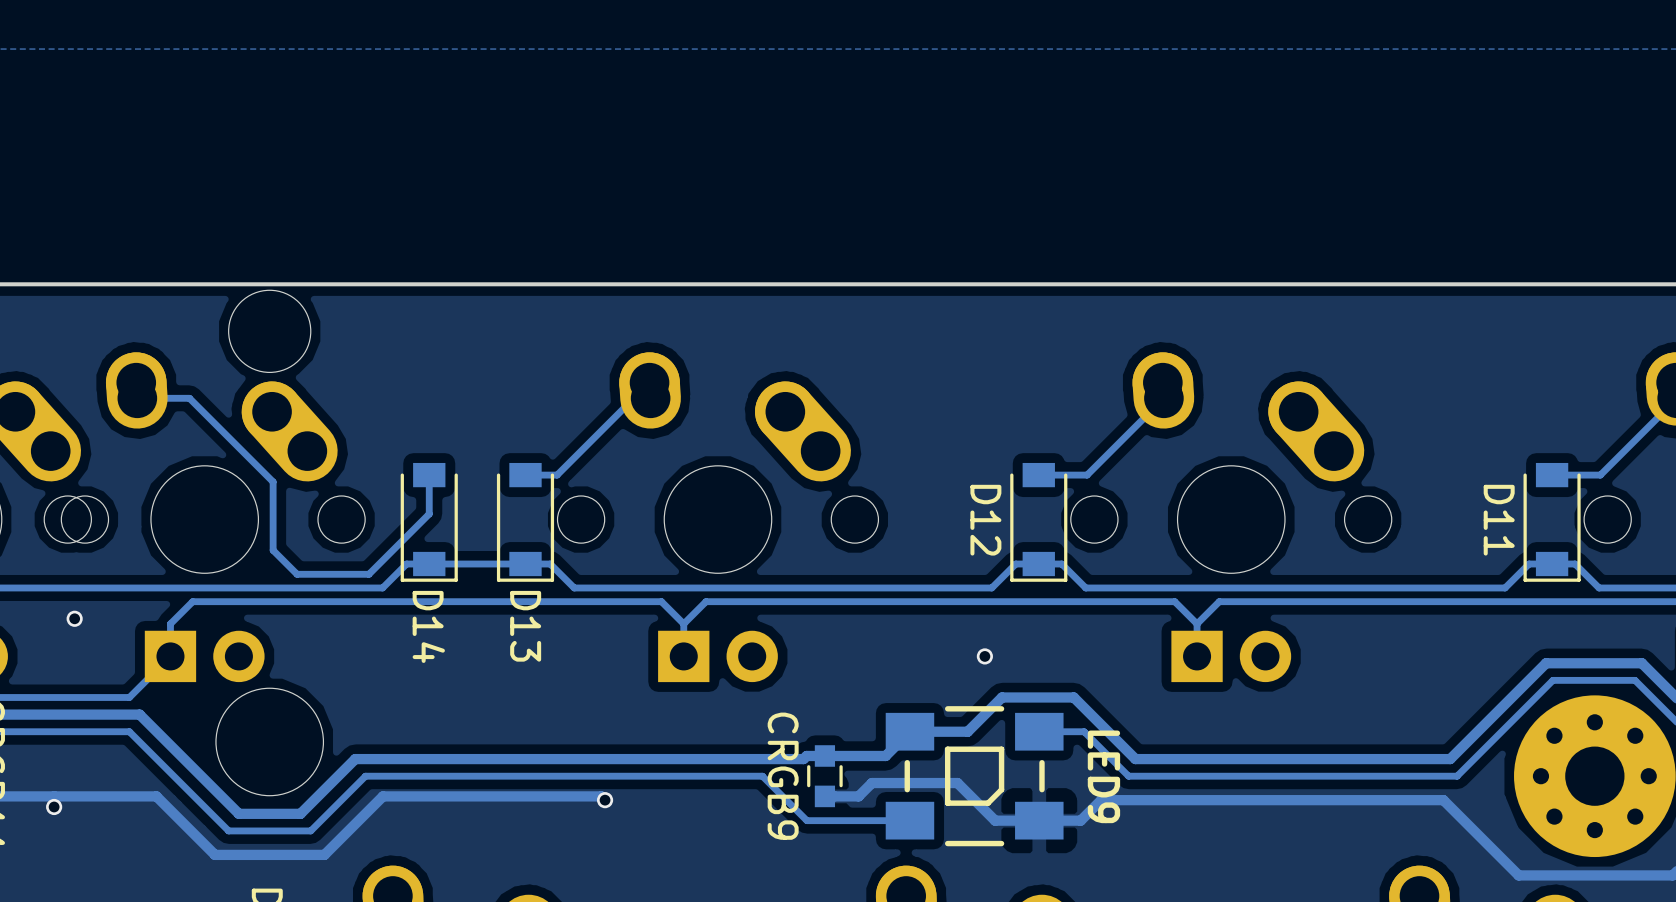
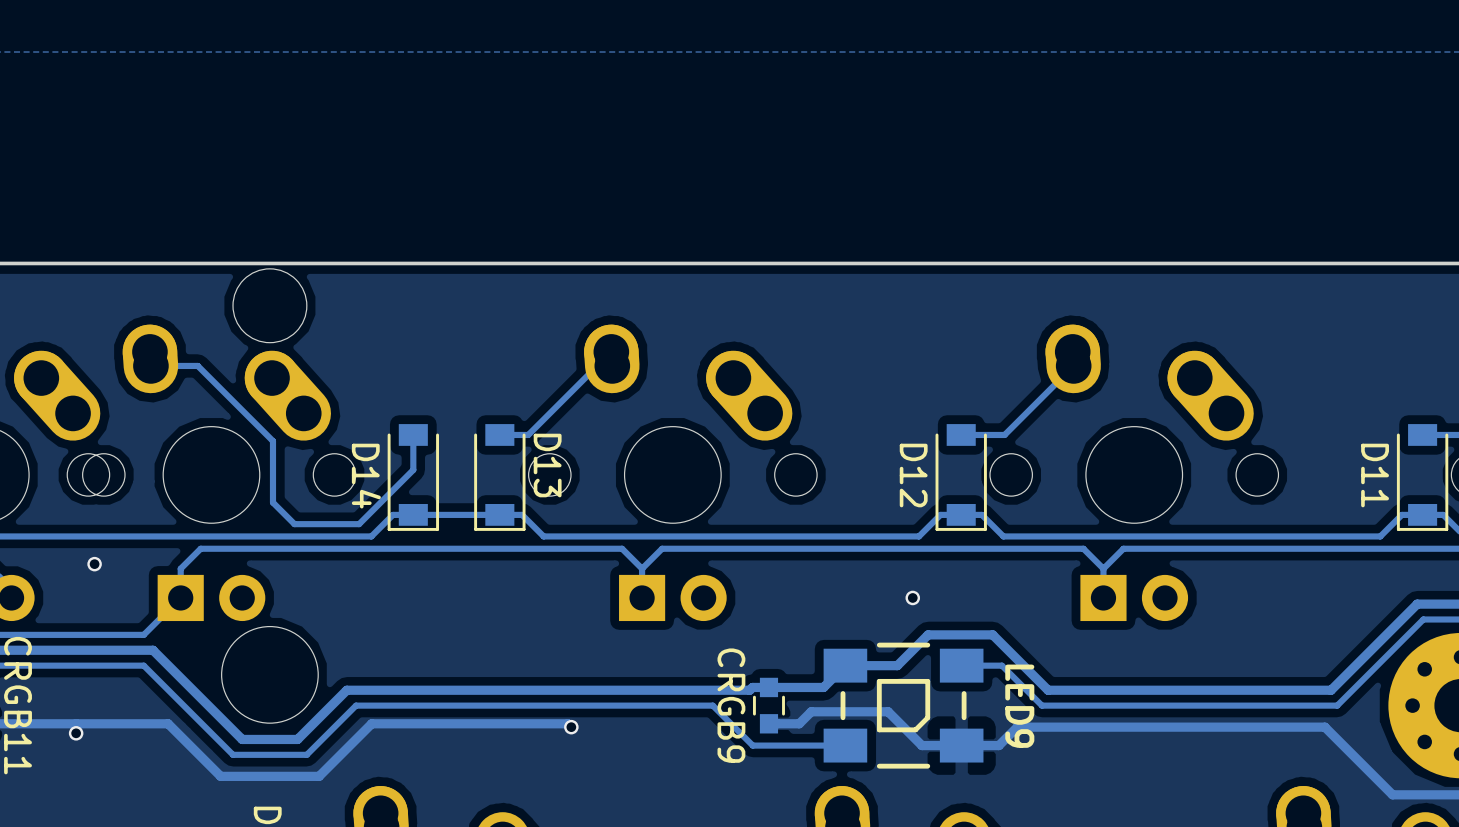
D14 name position: D14 (428, 626) -> D14 (366, 476)
D13 name position: D13 (525, 626) -> D13 (547, 465)

